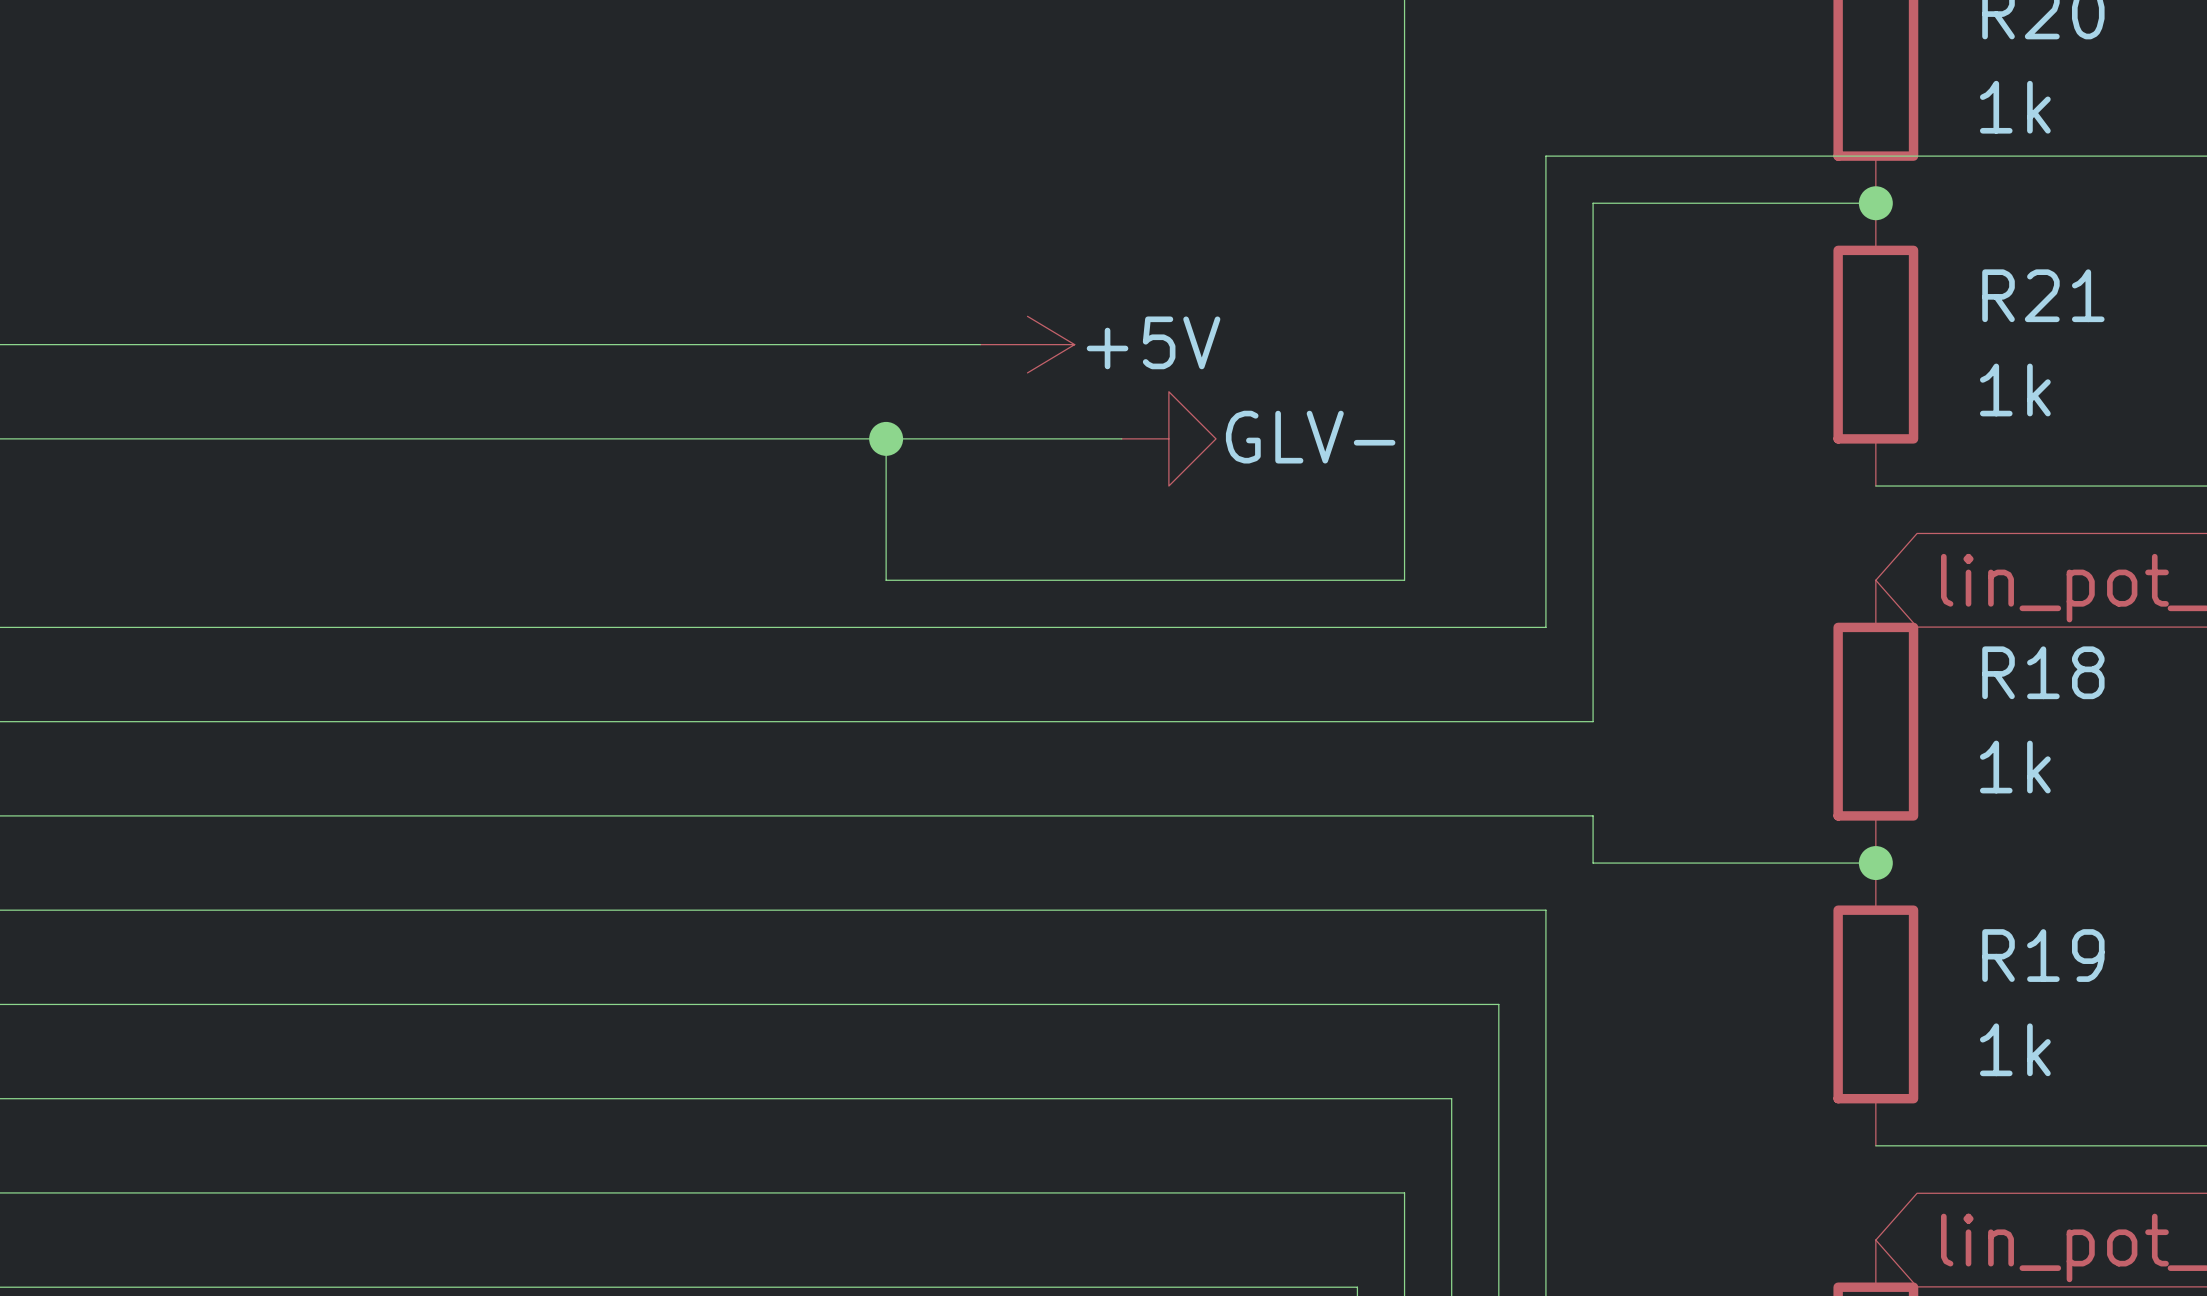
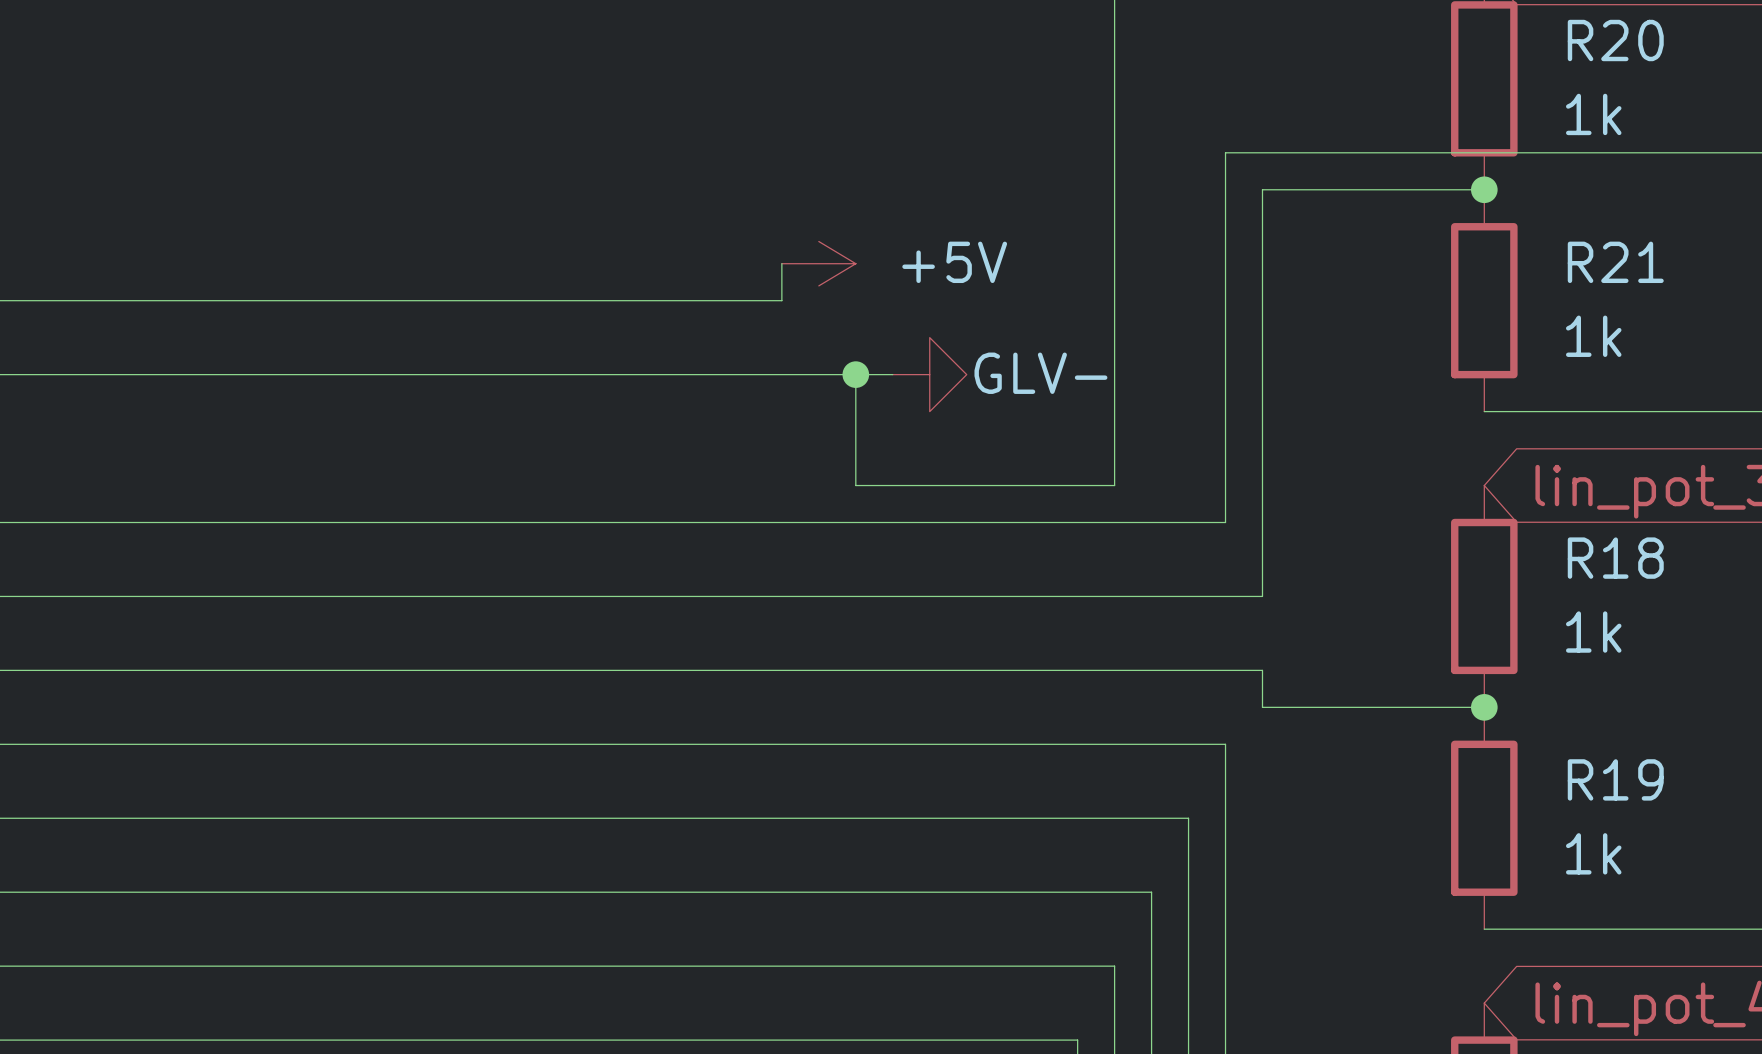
wire: none -> (781, 263) (781, 300)
power symbol text position: +5V (1153, 342) -> +5V (954, 262)
power symbol position: +5V (1027, 344) -> +5V (818, 263)
wire: (886, 438) (886, 580) (1074, 580) -> (855, 374) (855, 485)
junction position: (886, 438) -> (855, 374)

